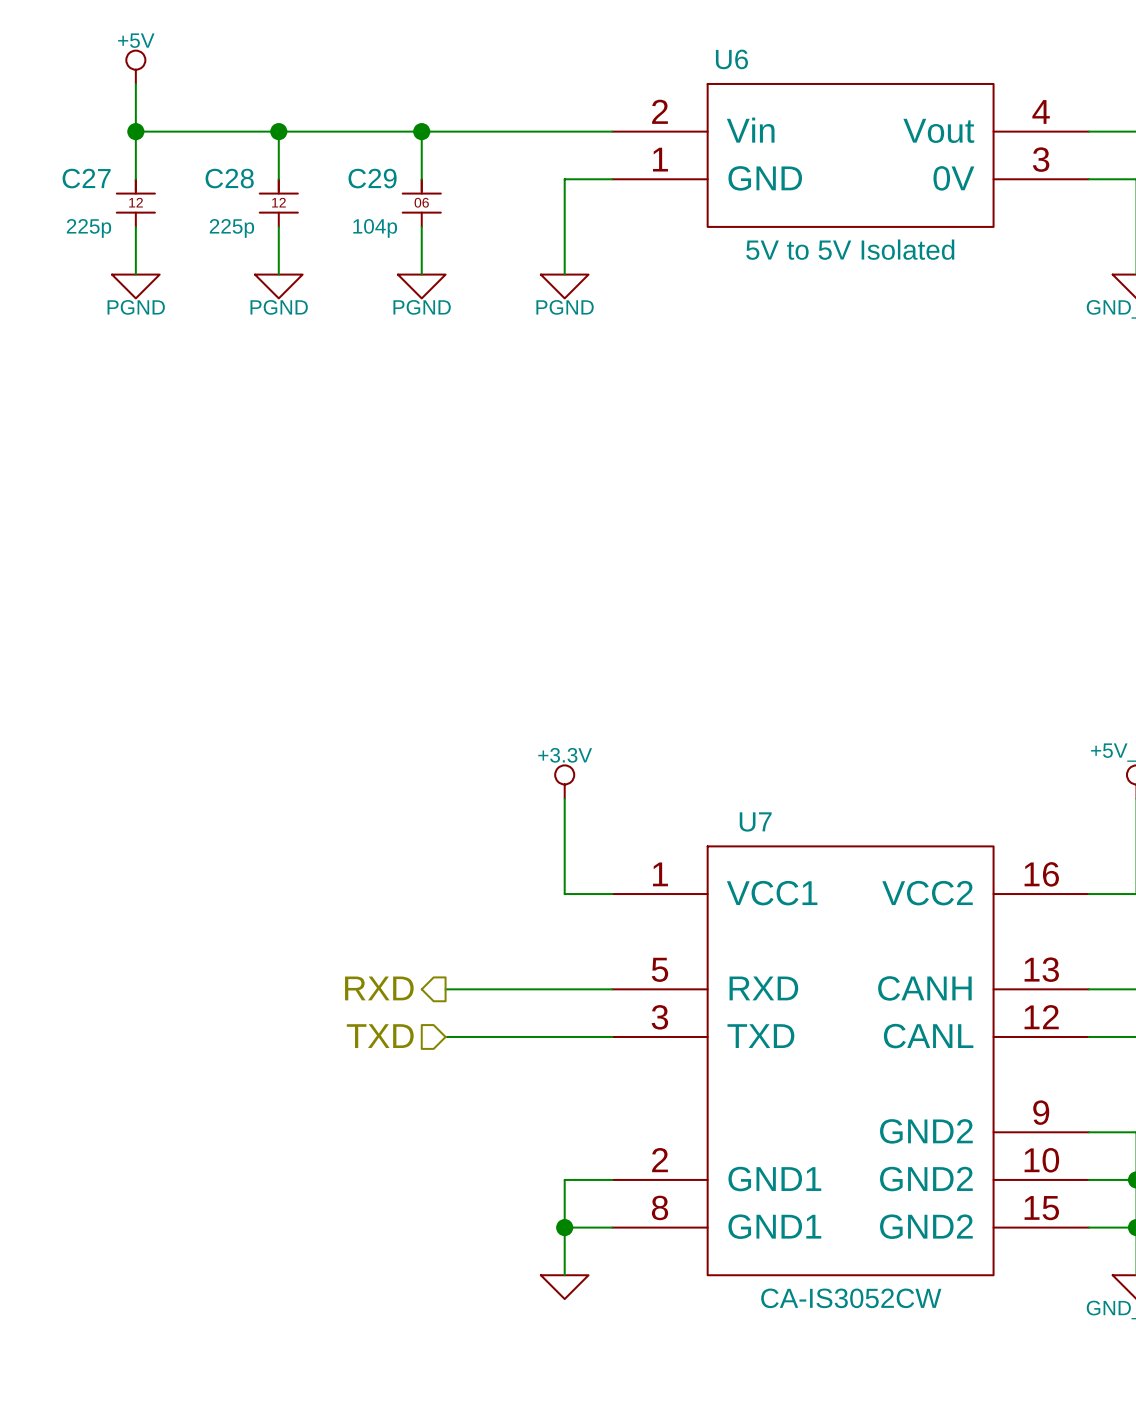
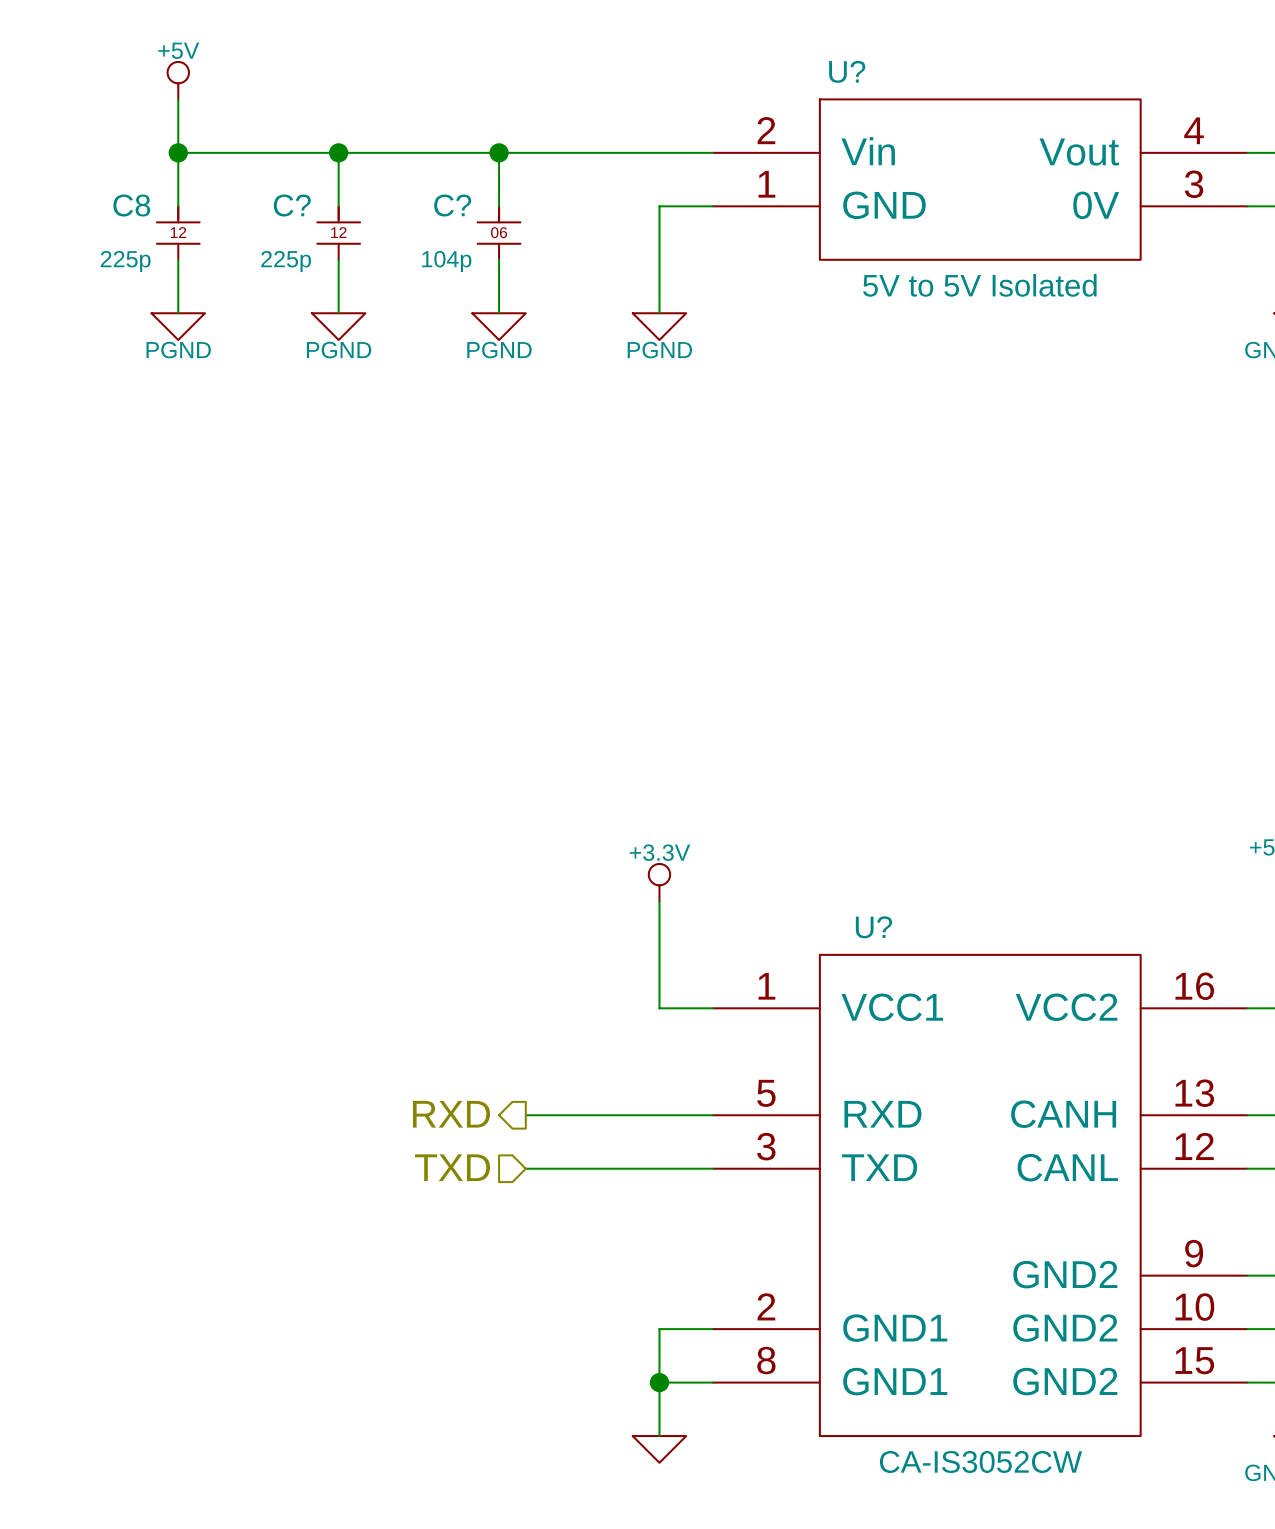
U6 name: U6 (731, 59) -> U? (847, 71)
C27 name: C27 (86, 178) -> C8 (131, 205)
C28 name: C28 (229, 178) -> C? (292, 205)
C29 name: C29 (372, 178) -> C? (452, 205)
U7 name: U7 (755, 821) -> U? (873, 927)

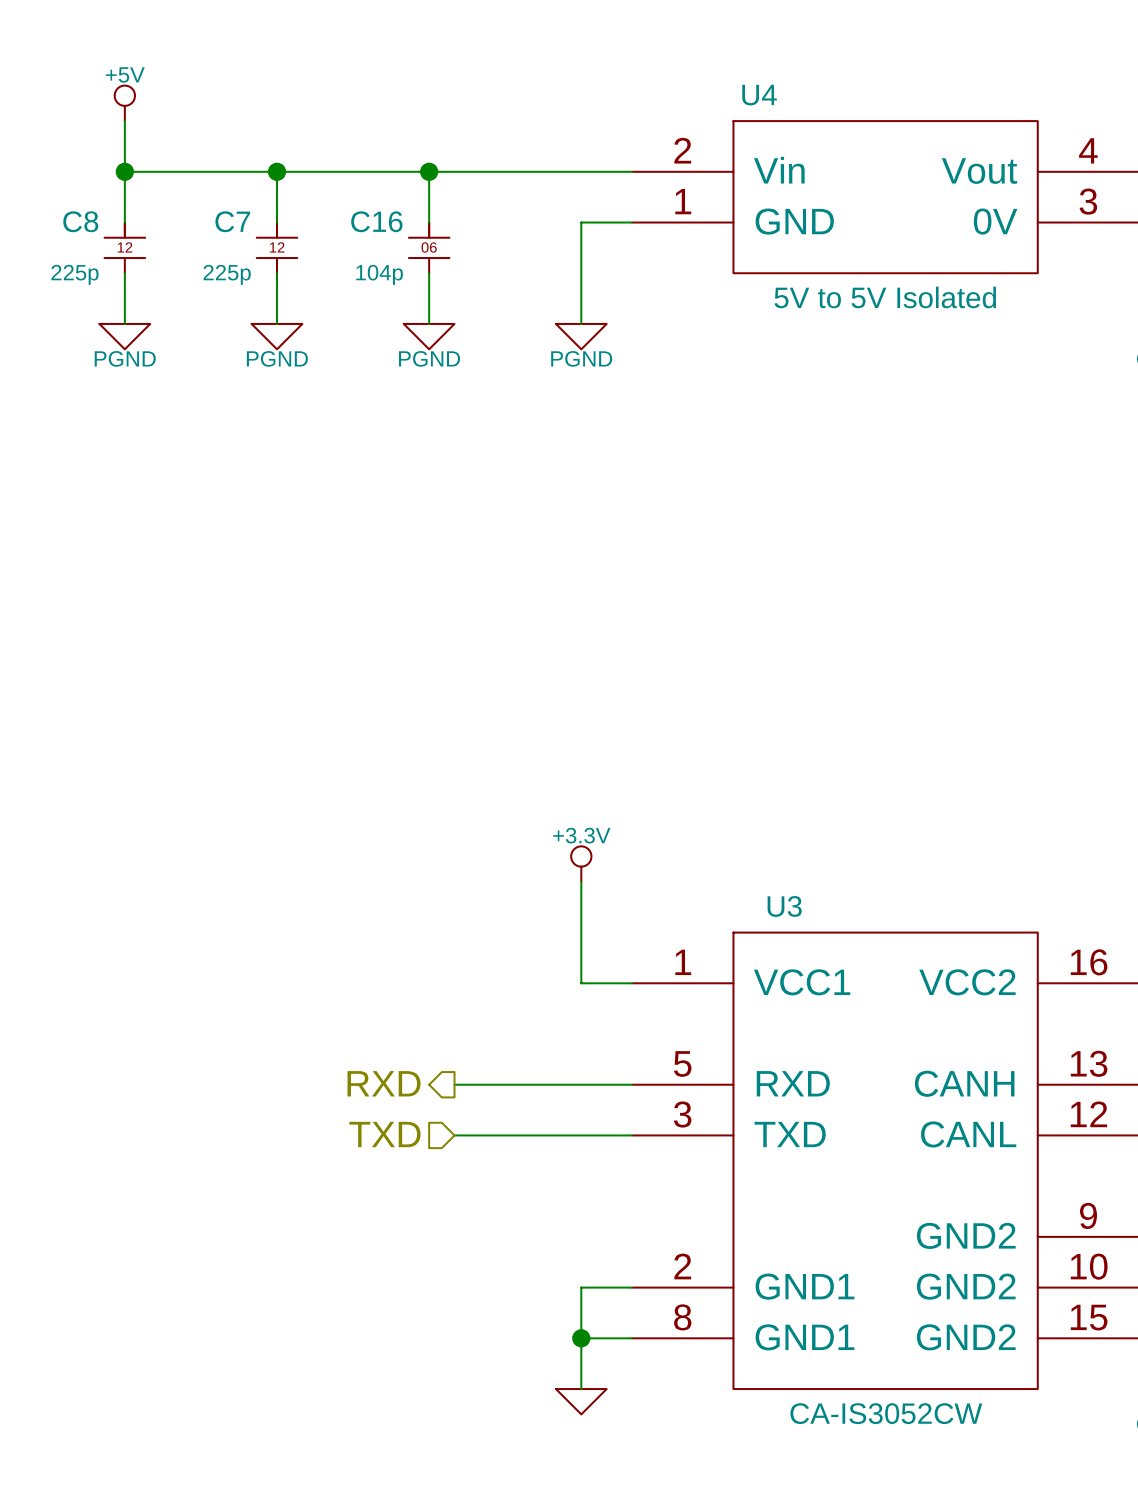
U? name: U? (847, 71) -> U4 (759, 95)
C? name: C? (292, 205) -> C7 (232, 221)
C? name: C? (452, 205) -> C16 (376, 221)
U? name: U? (873, 927) -> U3 (784, 906)

